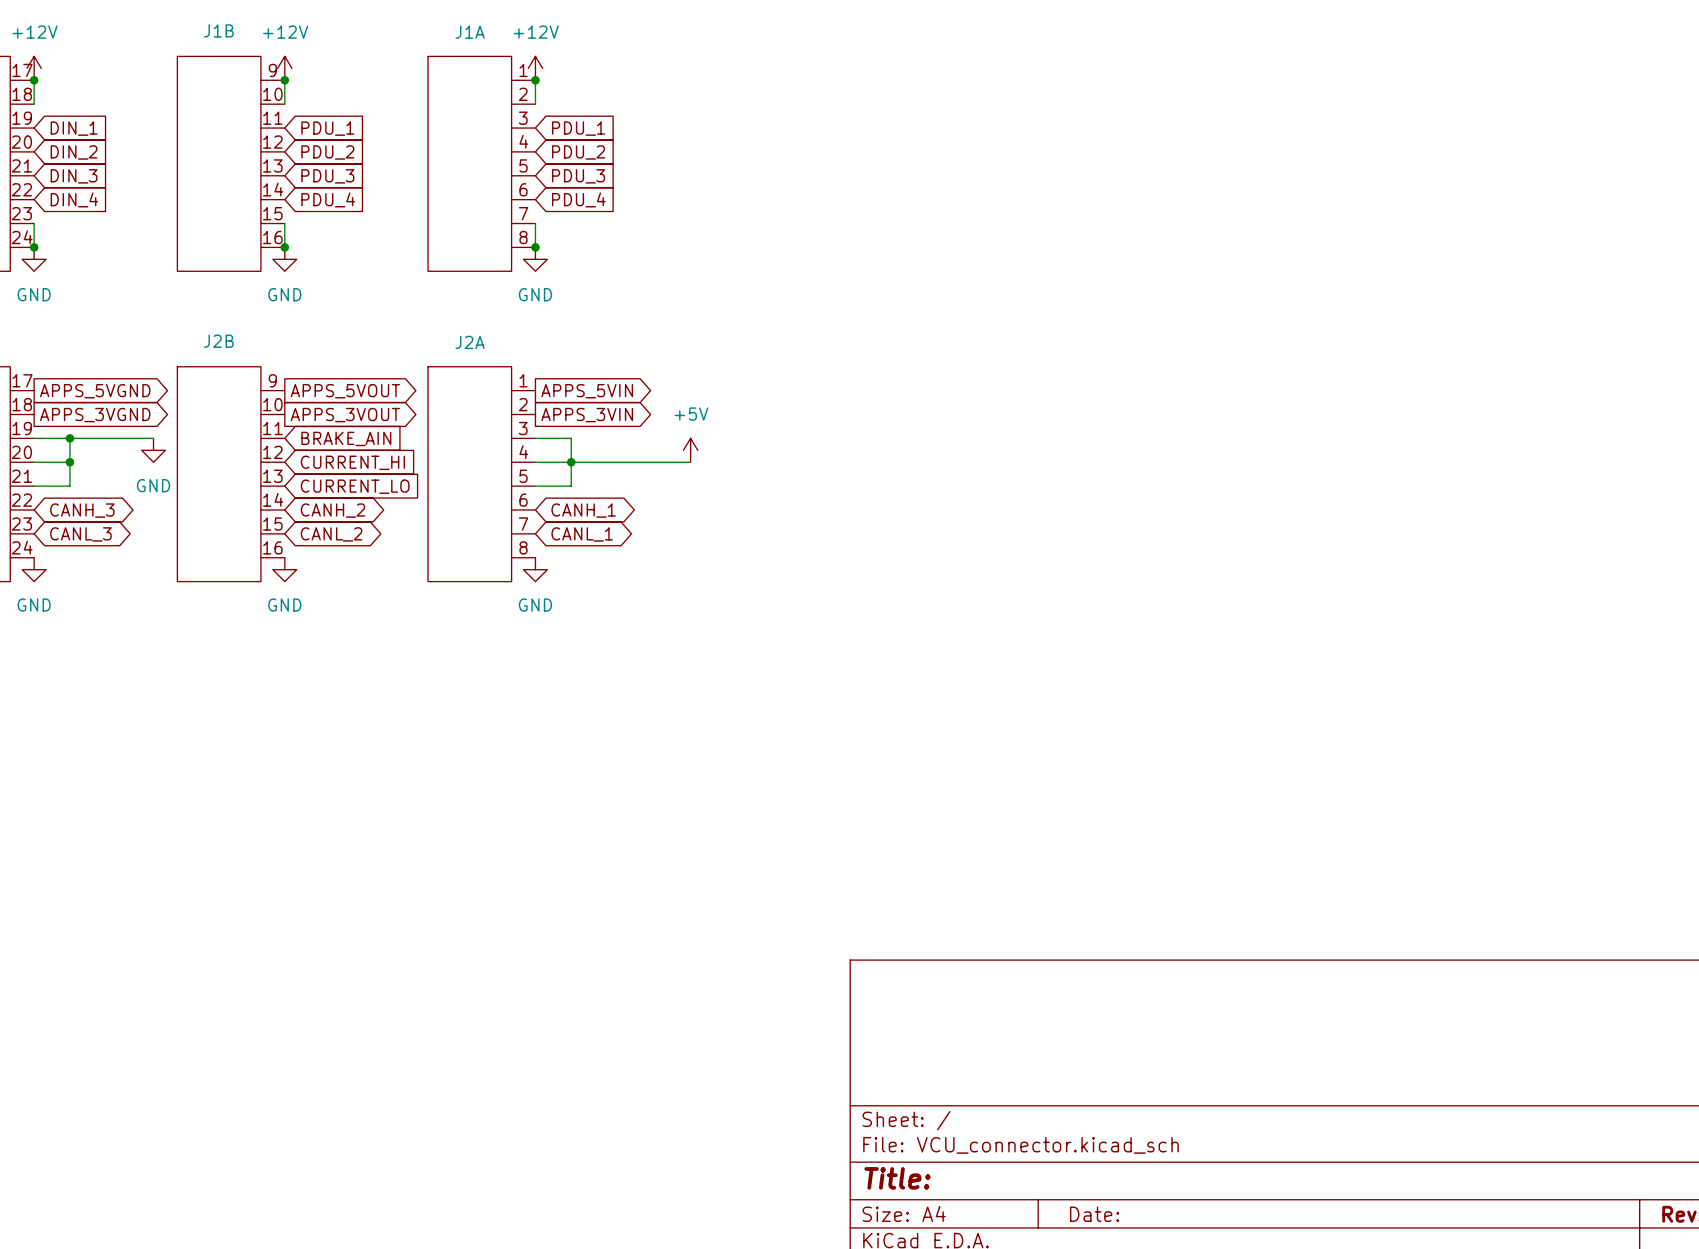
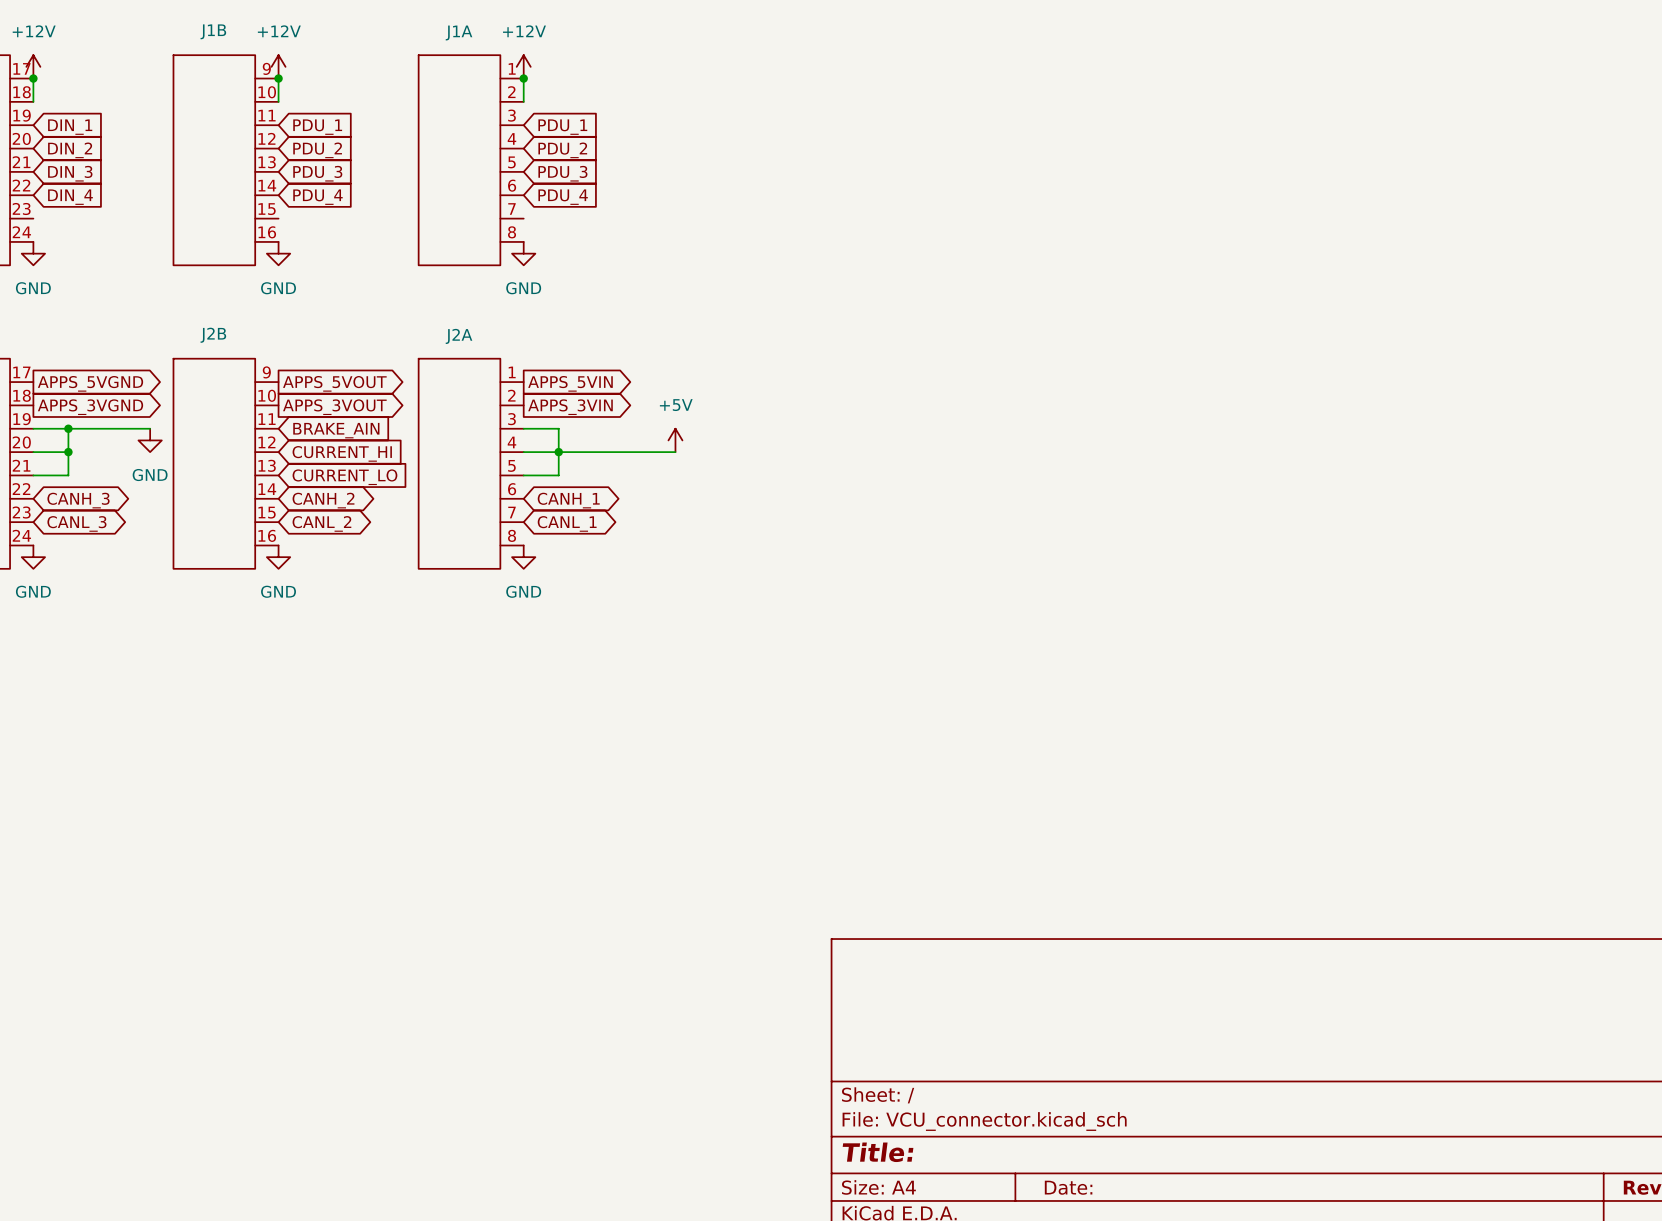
wire: (34, 223) (34, 247) -> none
wire: (284, 223) (284, 247) -> none
wire: (535, 223) (535, 247) -> none
junction: (34, 247) -> none
junction: (284, 247) -> none
junction: (535, 247) -> none

